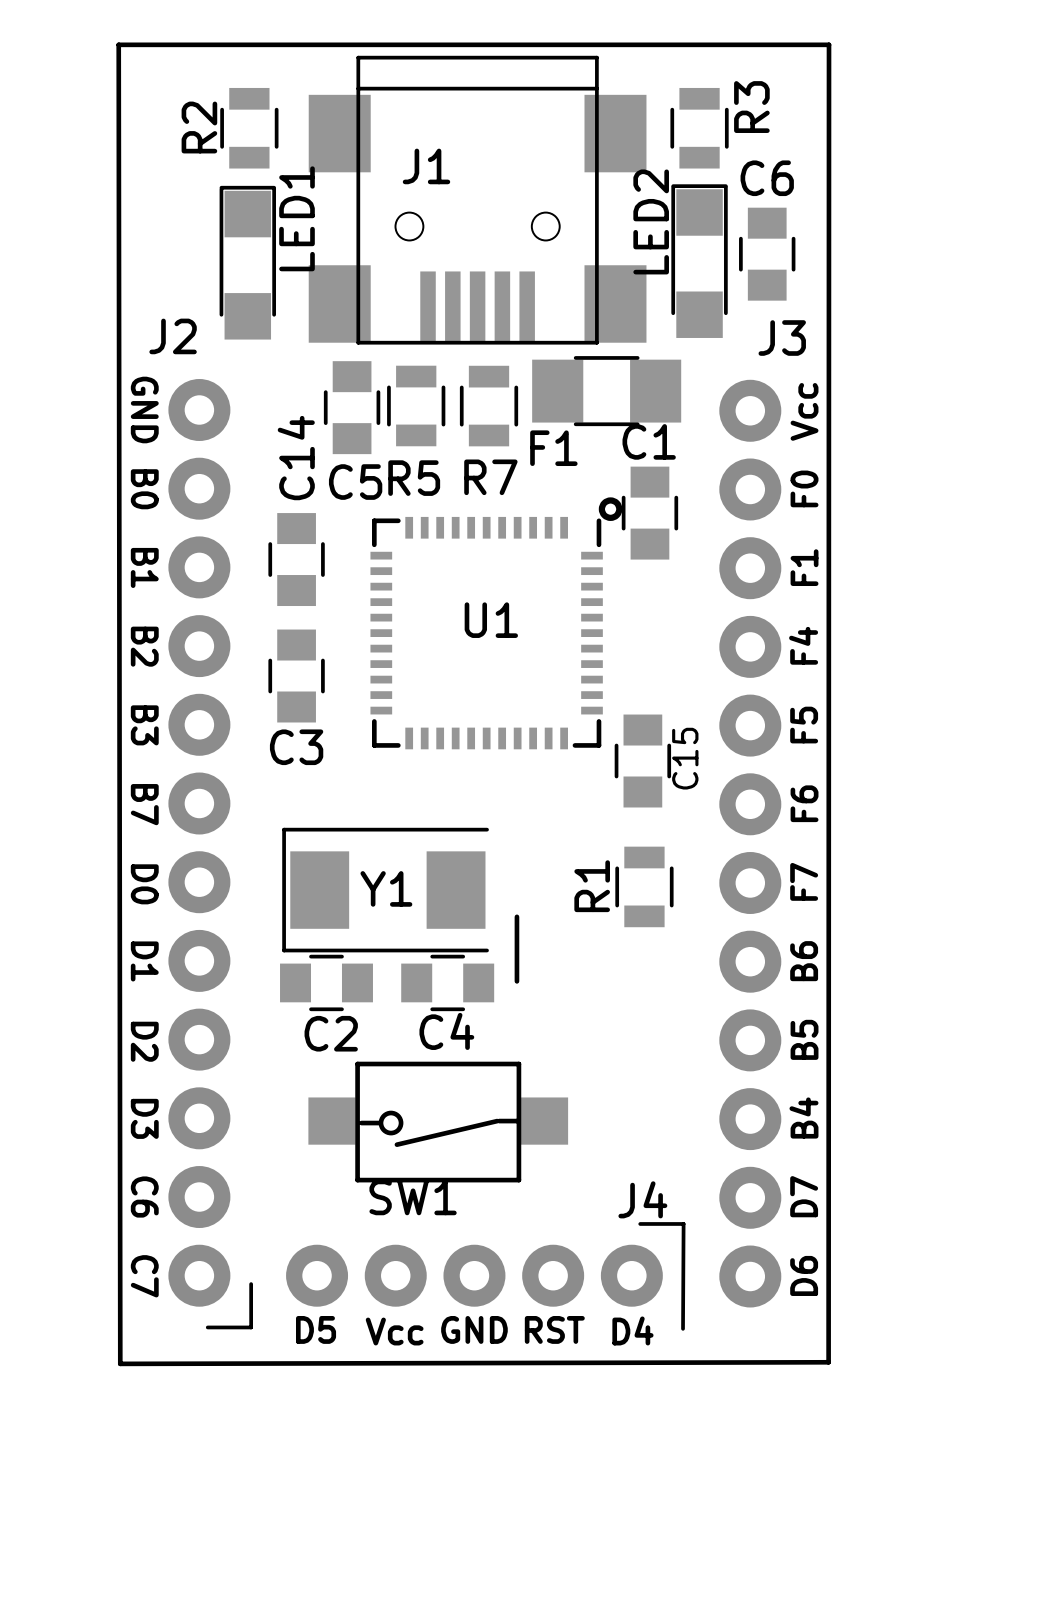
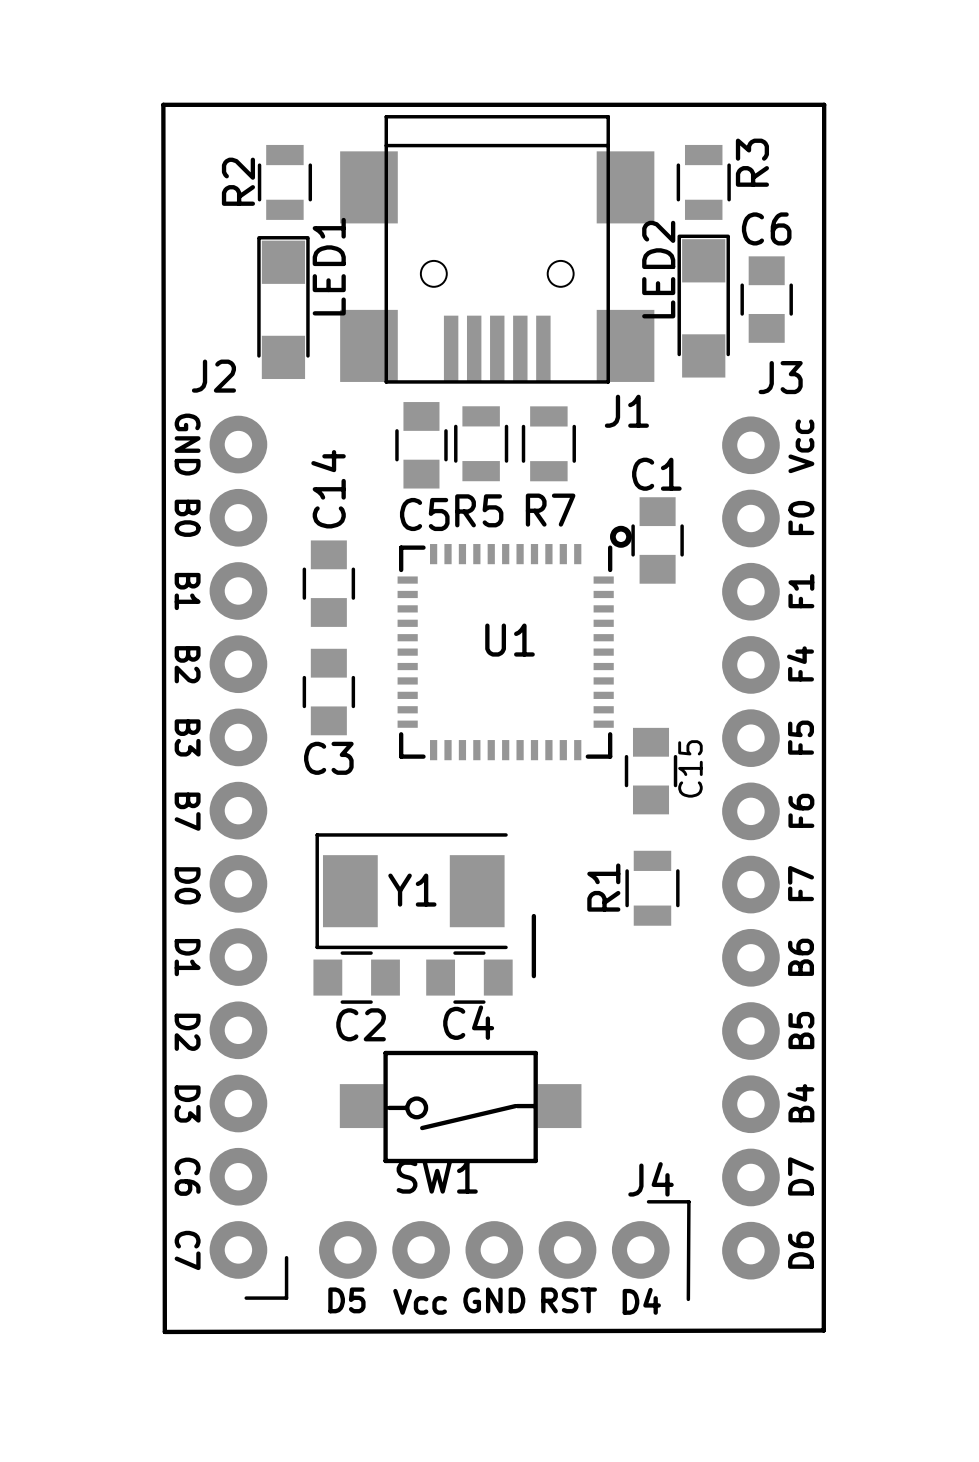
J1 name position: J1 (426, 166) -> J1 (626, 411)
F1: (606, 391) -> none
R5 position: (416, 405) -> (481, 443)
R7 position: (489, 406) -> (548, 443)
C5 position: (352, 407) -> (421, 445)

